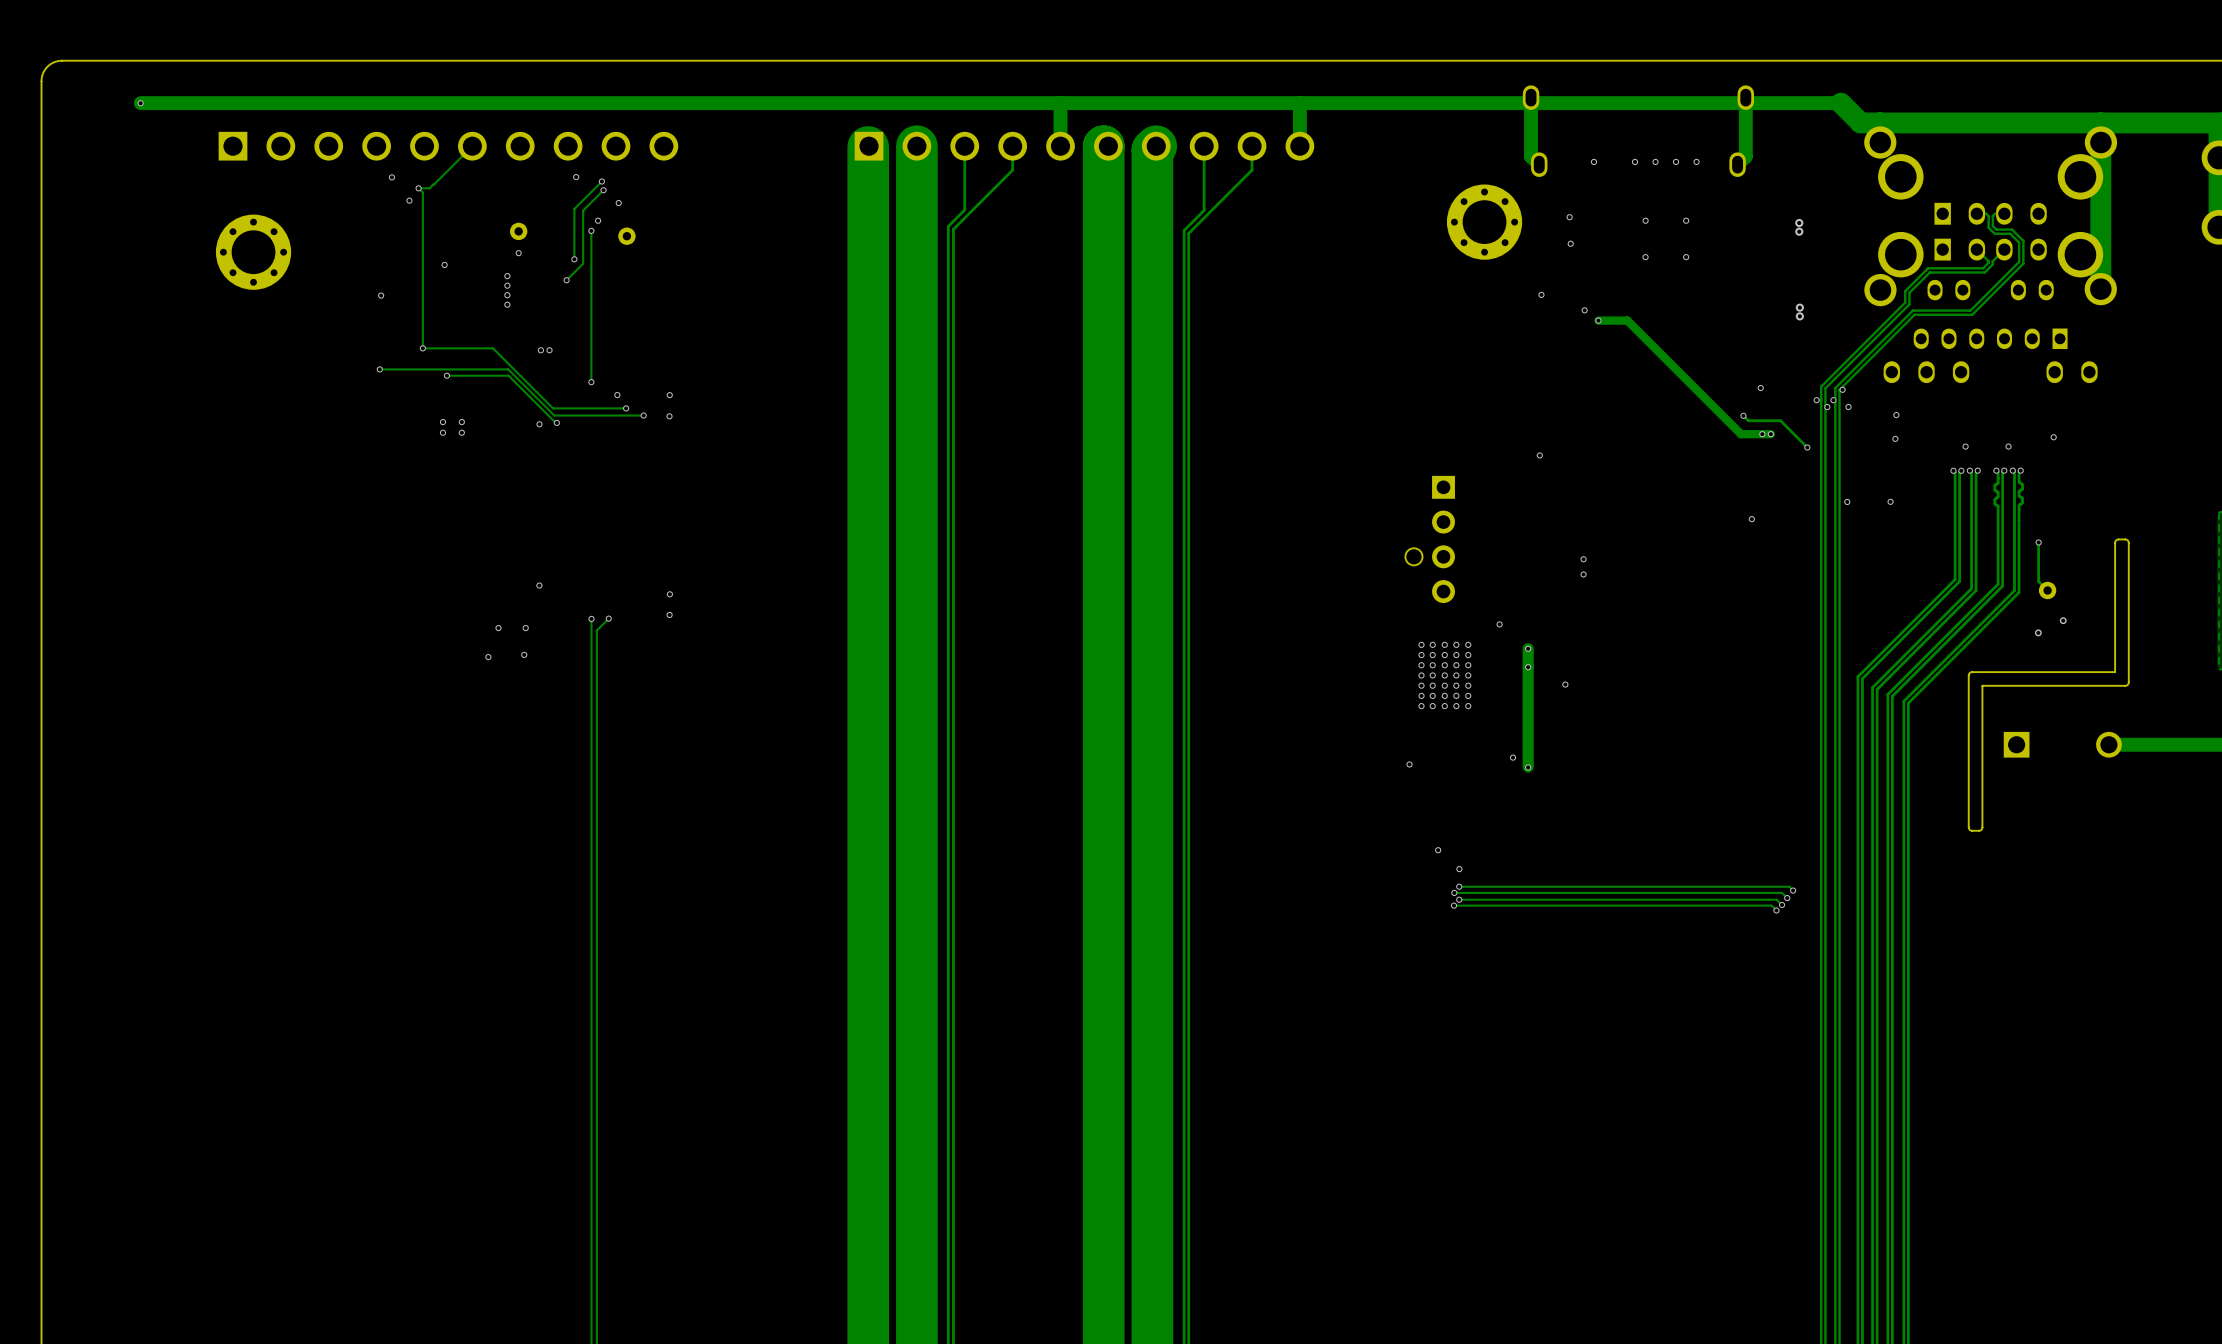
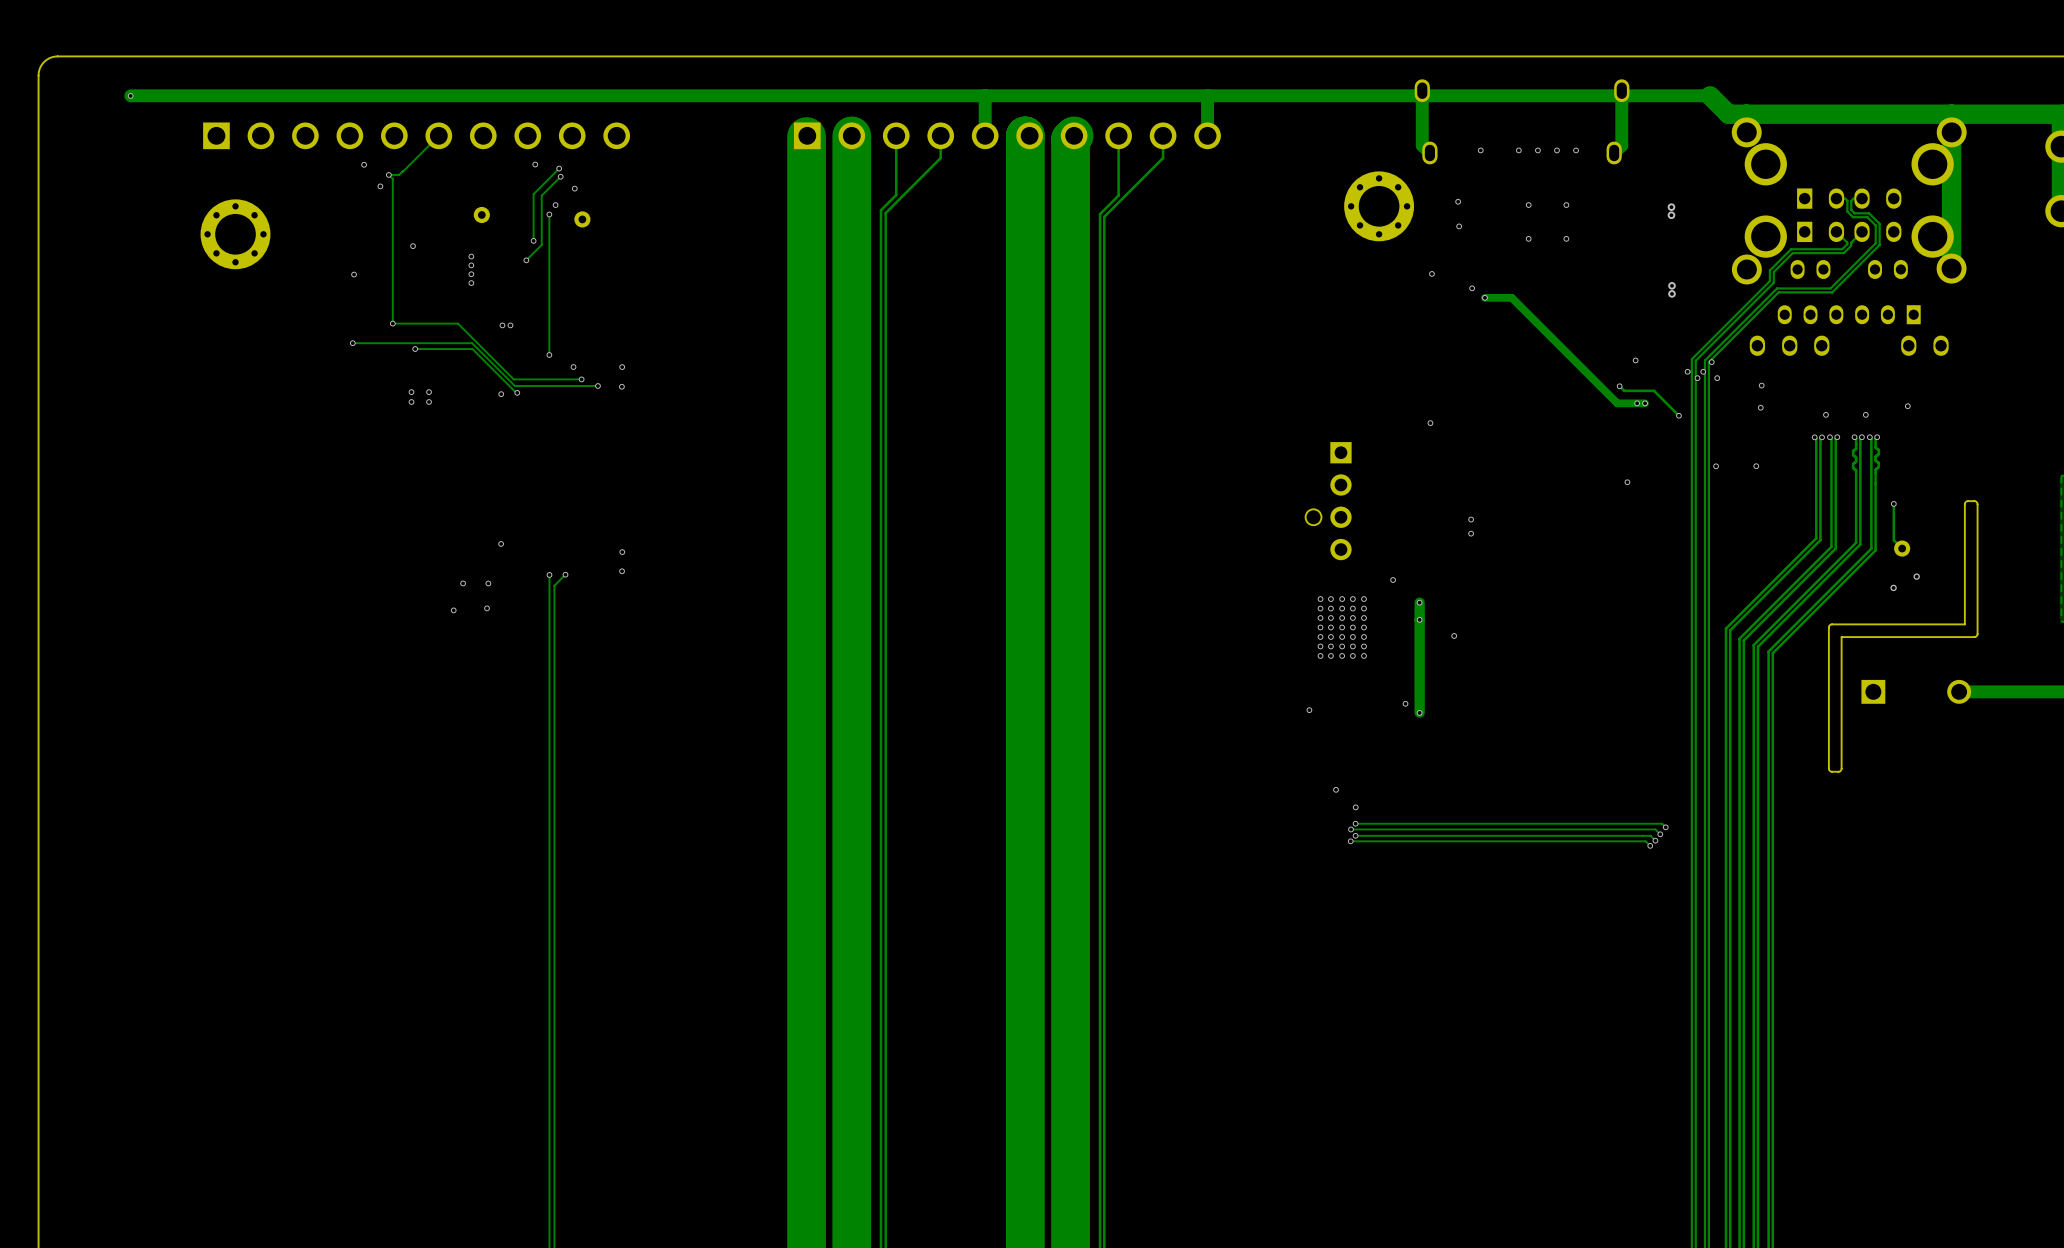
via: (518, 253) -> none

